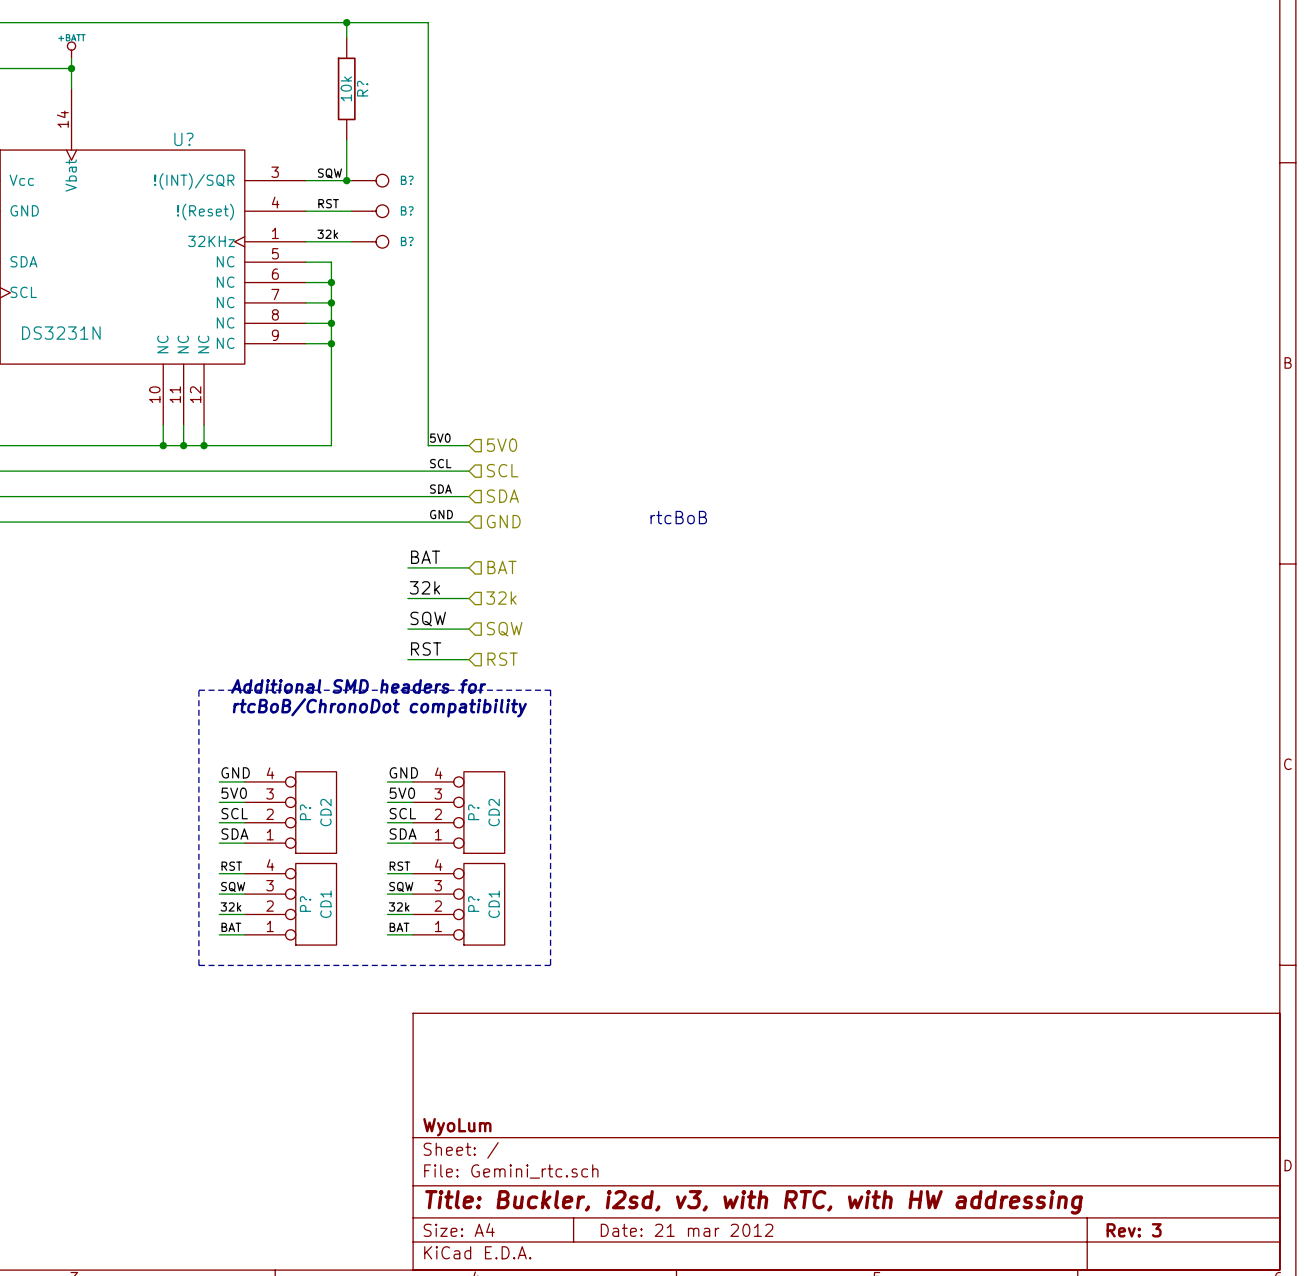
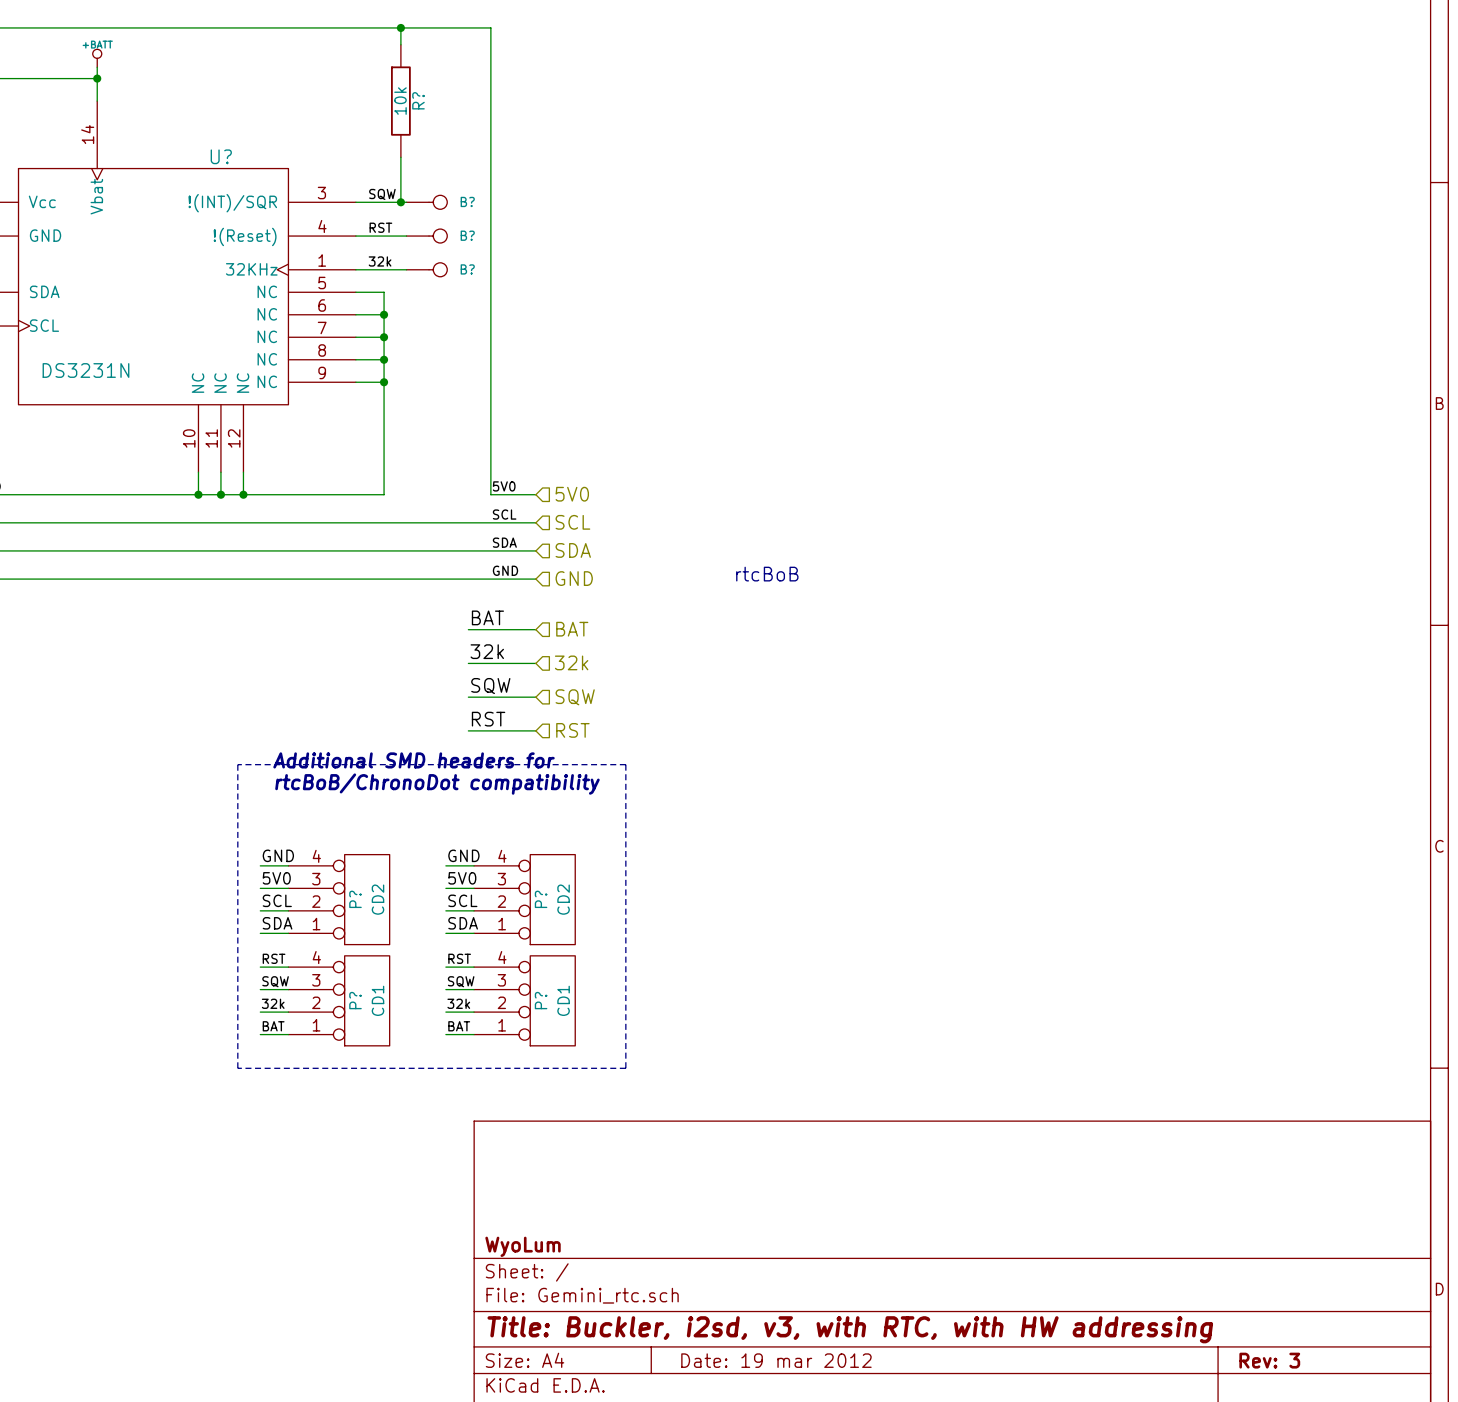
title block: Date: 21 mar 2012 (687, 1230) -> Date: 19 mar 2012 (776, 1360)

